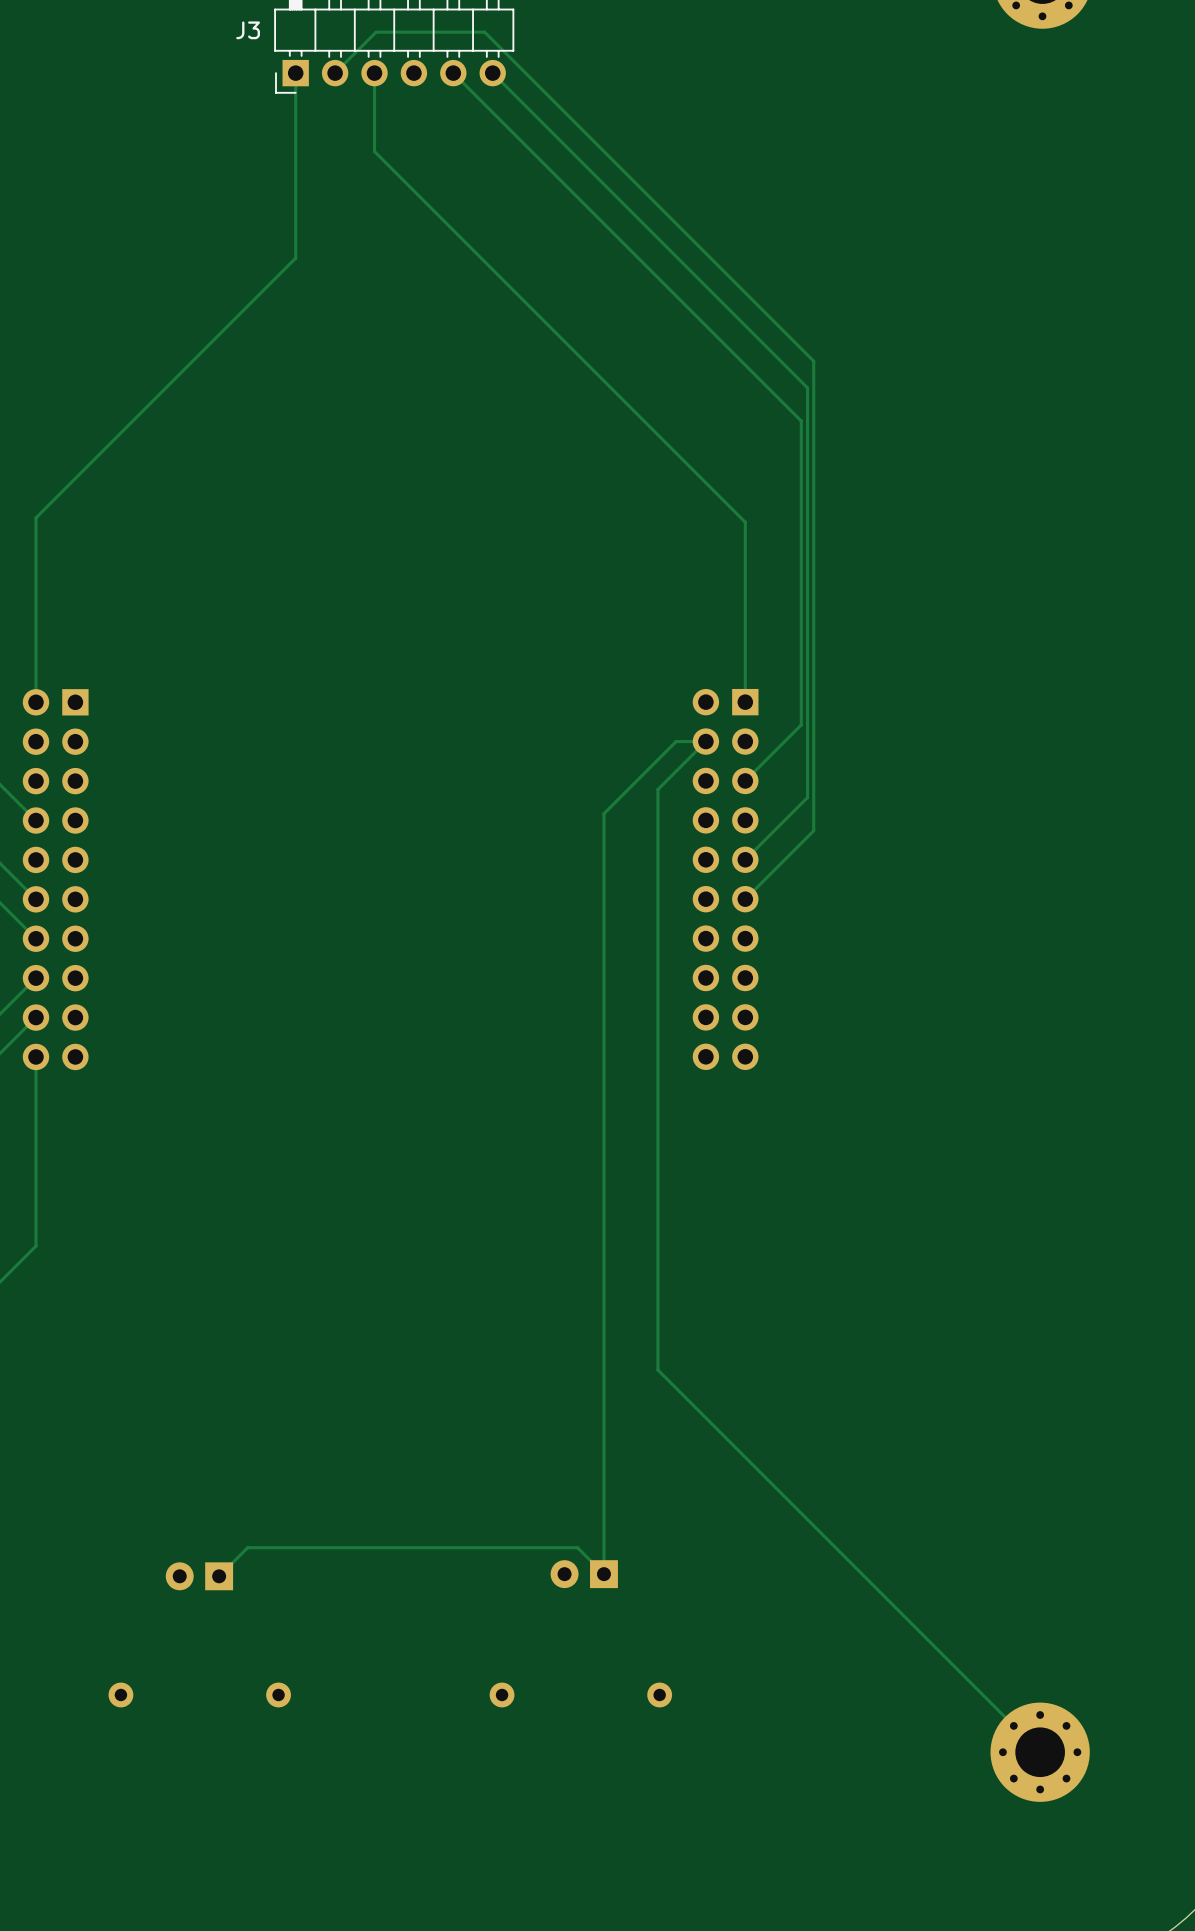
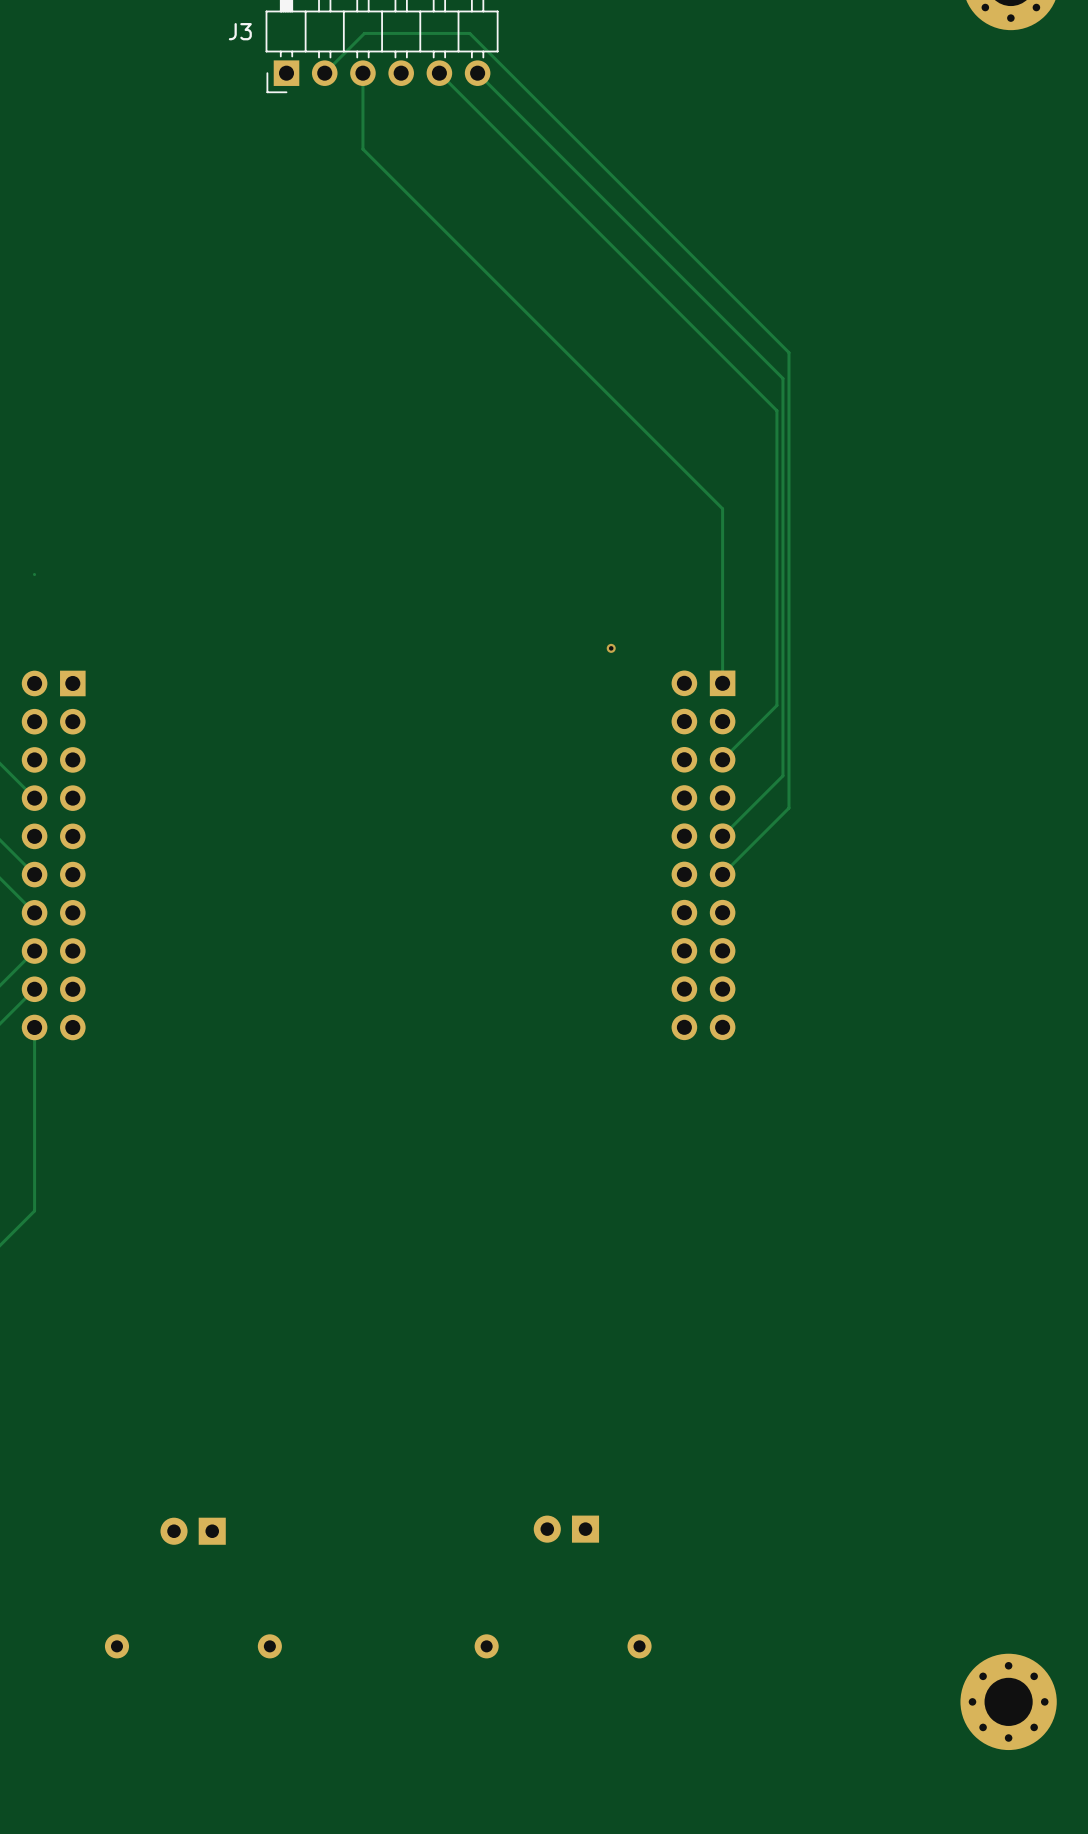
track: (295, 73) (295, 258) (35, 517) (35, 702) -> none
via: none -> (611, 648)
track: (219, 1576) (247, 1547) (577, 1547) (603, 1574) (603, 813) (676, 741) (705, 741) (657, 789) (657, 1370) (1040, 1752) -> none

